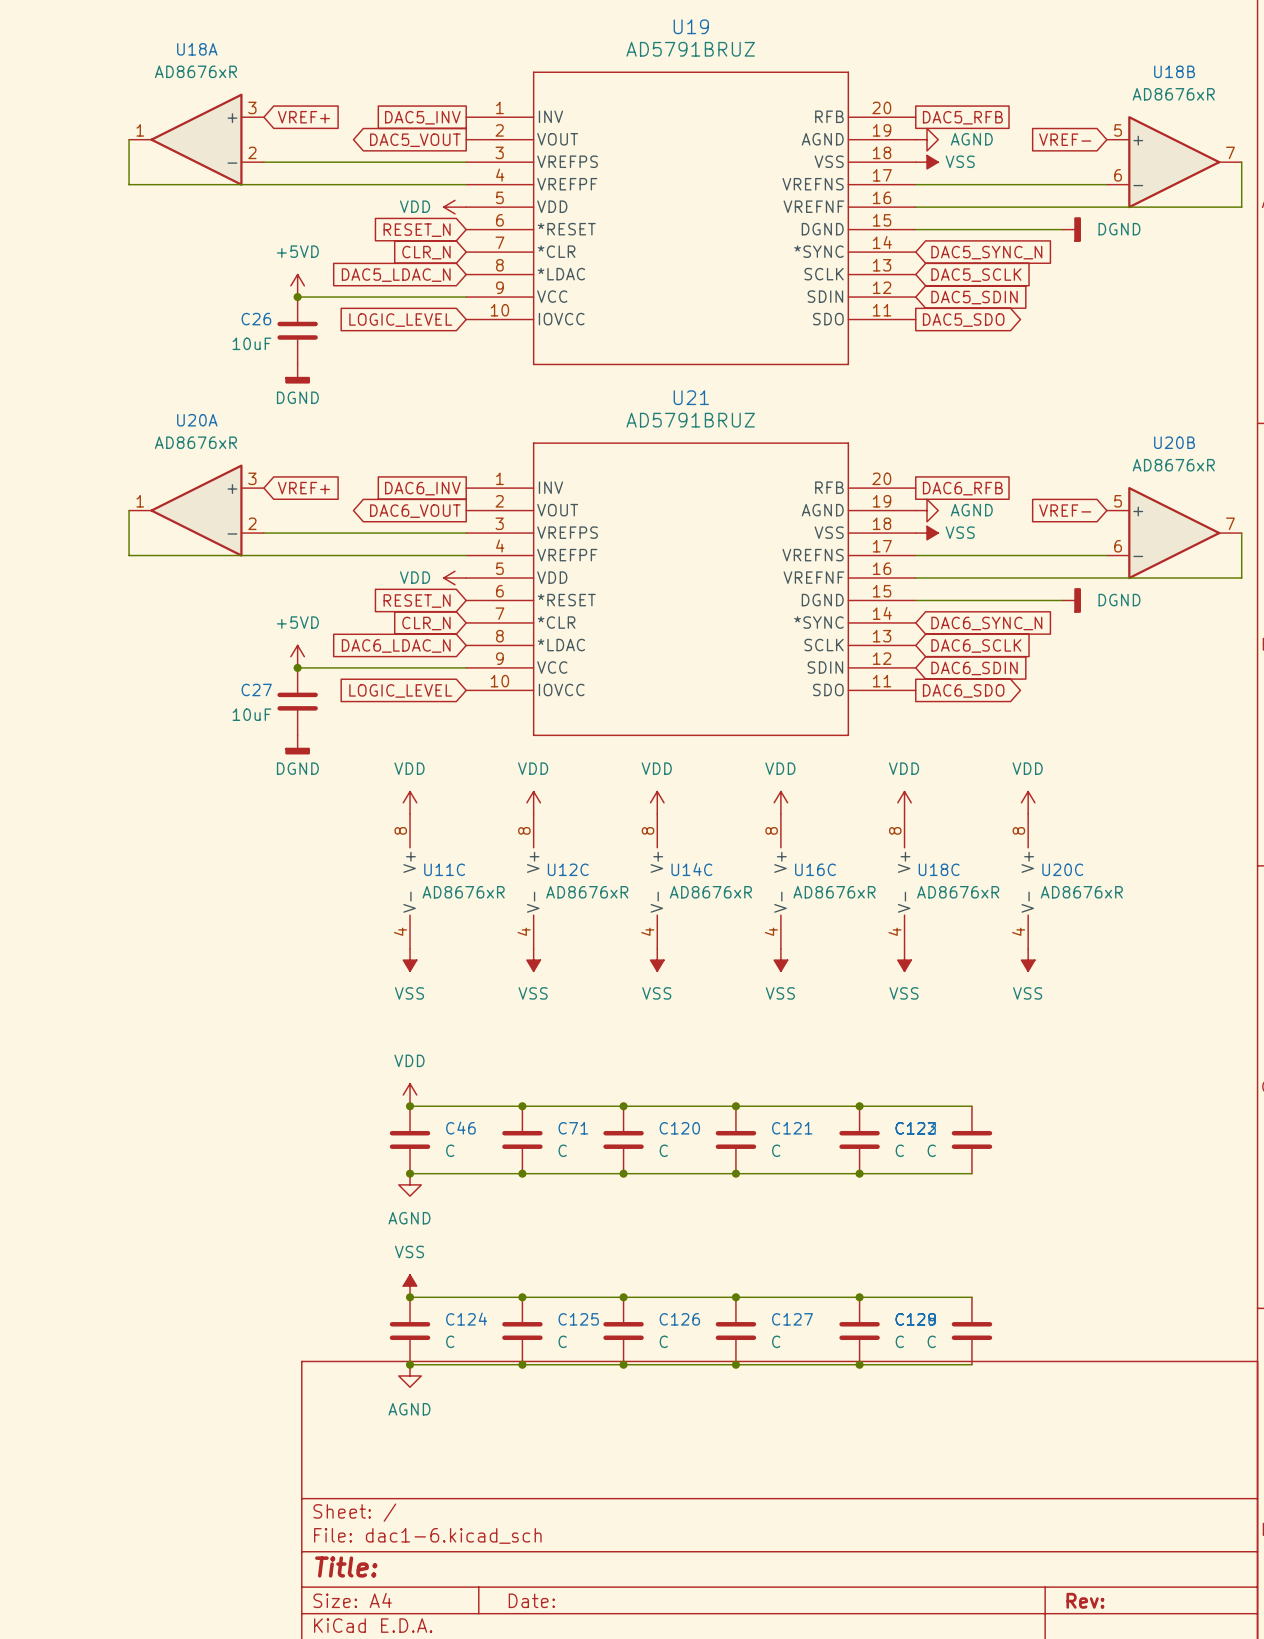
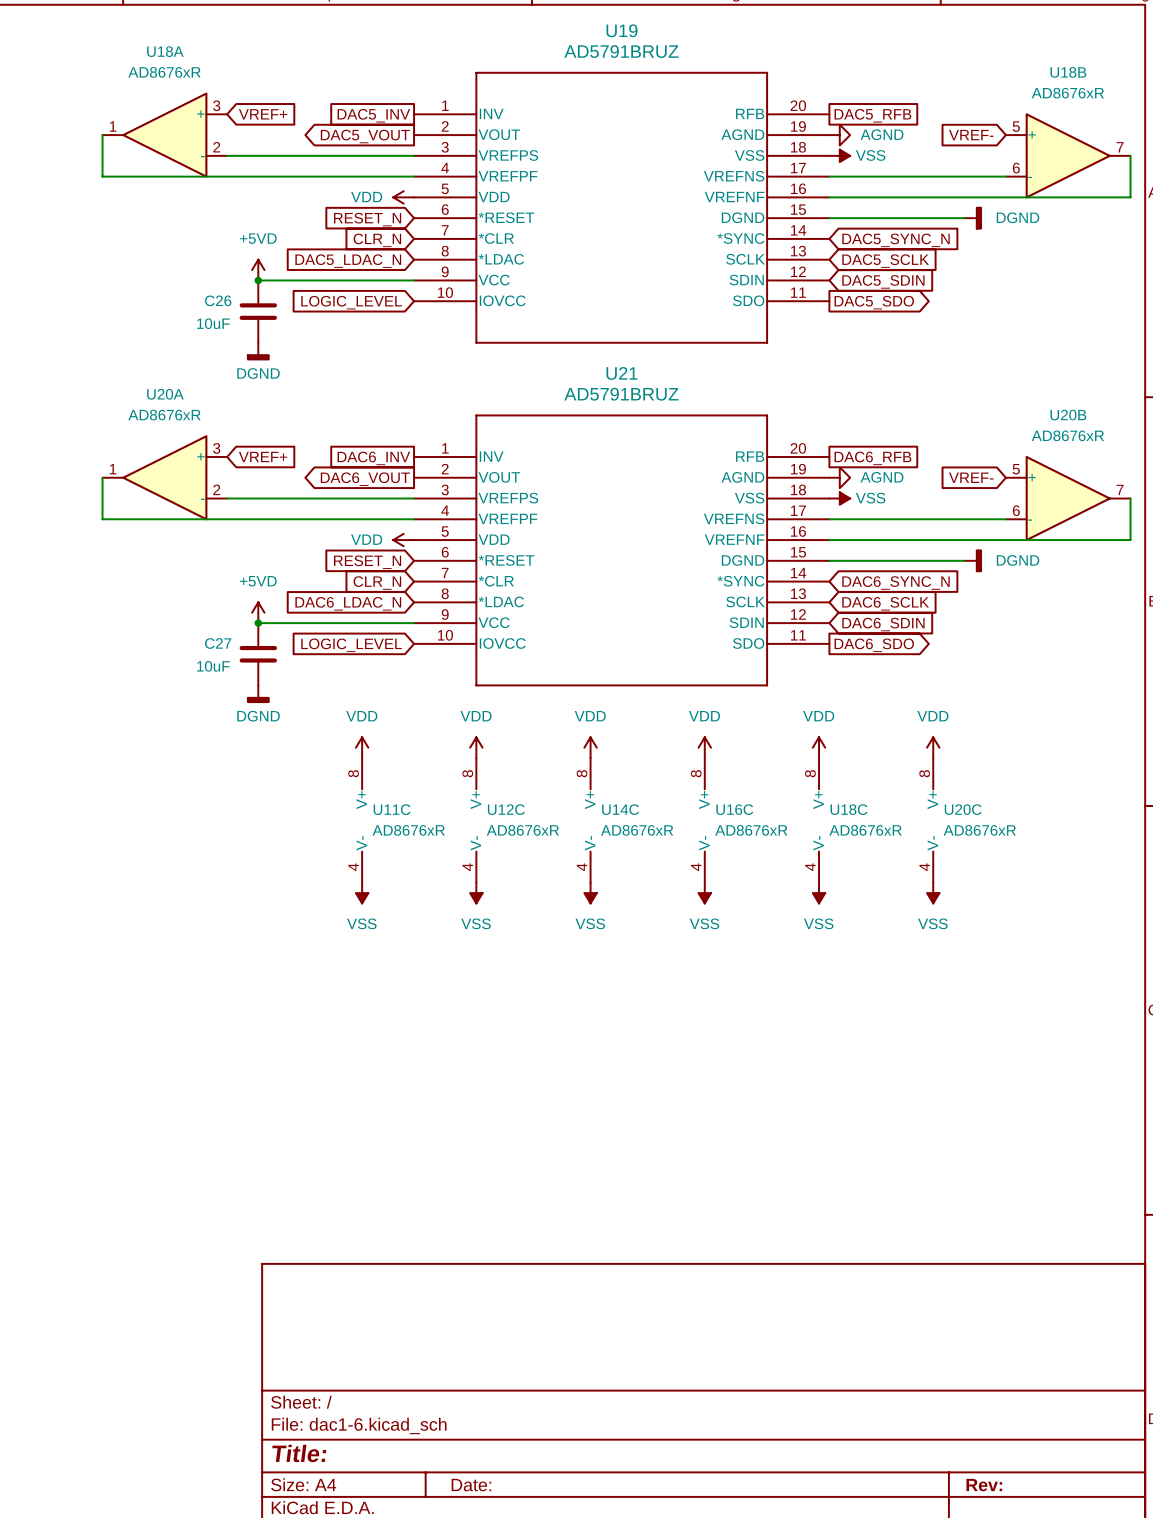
power symbol: VDD (410, 1095) -> none
wire: (410, 1106) (971, 1106) -> none
junction: (410, 1106) -> none
junction: (522, 1106) -> none
junction: (623, 1106) -> none
junction: (735, 1106) -> none
junction: (859, 1106) -> none
C46: C (410, 1139) -> none
C71: C (522, 1139) -> none
C120: C (623, 1139) -> none
C121: C (735, 1139) -> none
part: C (859, 1139) -> none
part: C (971, 1139) -> none
wire: (410, 1173) (971, 1173) -> none
junction: (410, 1173) -> none
junction: (522, 1173) -> none
junction: (623, 1173) -> none
junction: (735, 1173) -> none
junction: (859, 1173) -> none
power symbol: AGND (410, 1184) -> none
power symbol: VSS (410, 1286) -> none
wire: (410, 1297) (971, 1297) -> none
junction: (410, 1297) -> none
junction: (522, 1297) -> none
junction: (623, 1297) -> none
junction: (735, 1297) -> none
junction: (859, 1297) -> none
C124: C (410, 1331) -> none
C125: C (522, 1331) -> none
C126: C (623, 1331) -> none
C127: C (735, 1331) -> none
part: C (859, 1331) -> none
part: C (971, 1331) -> none
wire: (410, 1364) (971, 1364) -> none
junction: (410, 1364) -> none
junction: (522, 1364) -> none
junction: (623, 1364) -> none
junction: (735, 1364) -> none
junction: (859, 1364) -> none
power symbol: AGND (410, 1375) -> none

